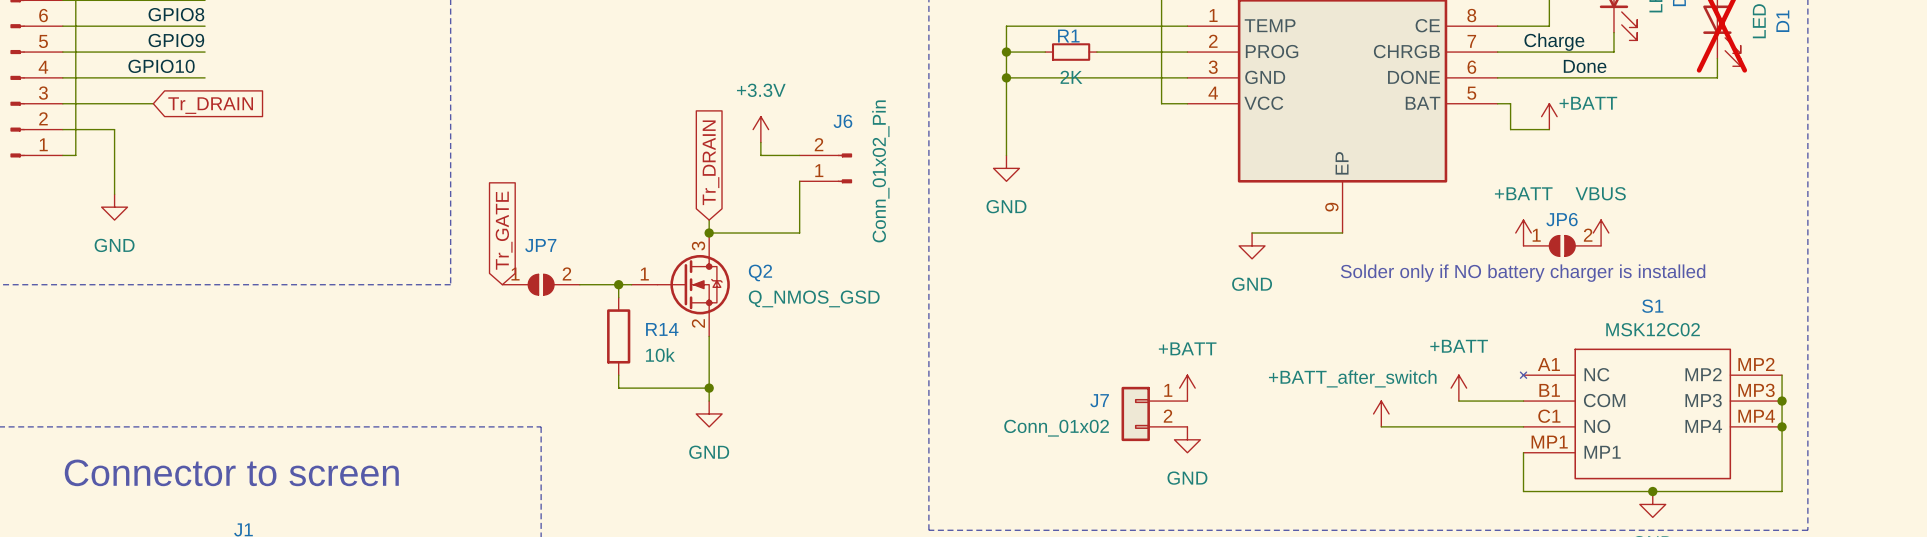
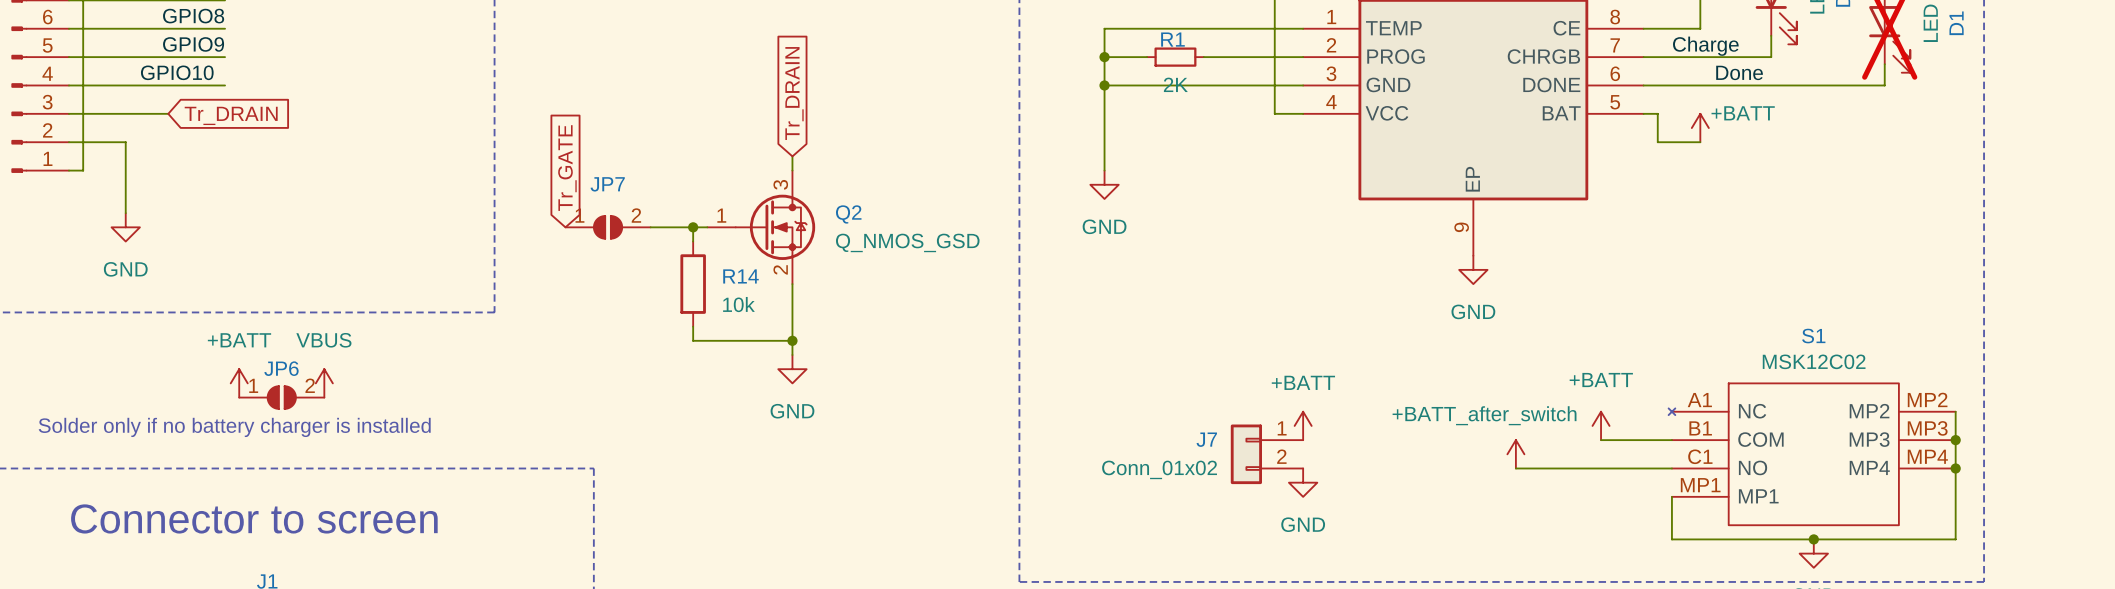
power symbol: +3.3V (760, 129) -> none
wire: (760, 142) (760, 155) (799, 155) -> none
global label position: Tr_DRAIN (711, 162) -> Tr_DRAIN (794, 93)
J6: Conn_01x02_Pin (825, 168) -> none
wire: (799, 181) (799, 233) (709, 233) (709, 220) -> none
junction: none -> (693, 227)
global label position: Tr_GATE (504, 230) -> Tr_GATE (567, 168)
junction: (709, 233) -> none
wire: (1252, 233) (1342, 233) -> none
power symbol: +BATT (1523, 233) -> none
power symbol: VBUS (1601, 233) -> none
power symbol position: GND (1252, 245) -> GND (1473, 269)
JP6 position: (1562, 245) -> (281, 397)
text: Solder only if NO battery charger is installed (1523, 273) -> none
JP7 position: (541, 284) -> (608, 227)
wire: (579, 284) (631, 284) -> (650, 227) (707, 227)
wire: (618, 284) (618, 297) -> (693, 227) (693, 241)
junction: (618, 284) -> none
Q2 position: (680, 284) -> (761, 227)
junction: none -> (792, 340)
R14 position: (618, 336) -> (693, 284)
wire: (709, 336) (709, 401) -> (792, 284) (792, 355)
power symbol: none -> +BATT (239, 383)
power symbol: none -> VBUS (324, 383)
wire: (618, 375) (618, 388) (709, 388) -> (693, 326) (693, 340) (792, 340)
junction: (709, 388) -> none
text: none -> Solder only if no battery charger is installed (234, 427)
power symbol position: GND (709, 413) -> GND (792, 369)

